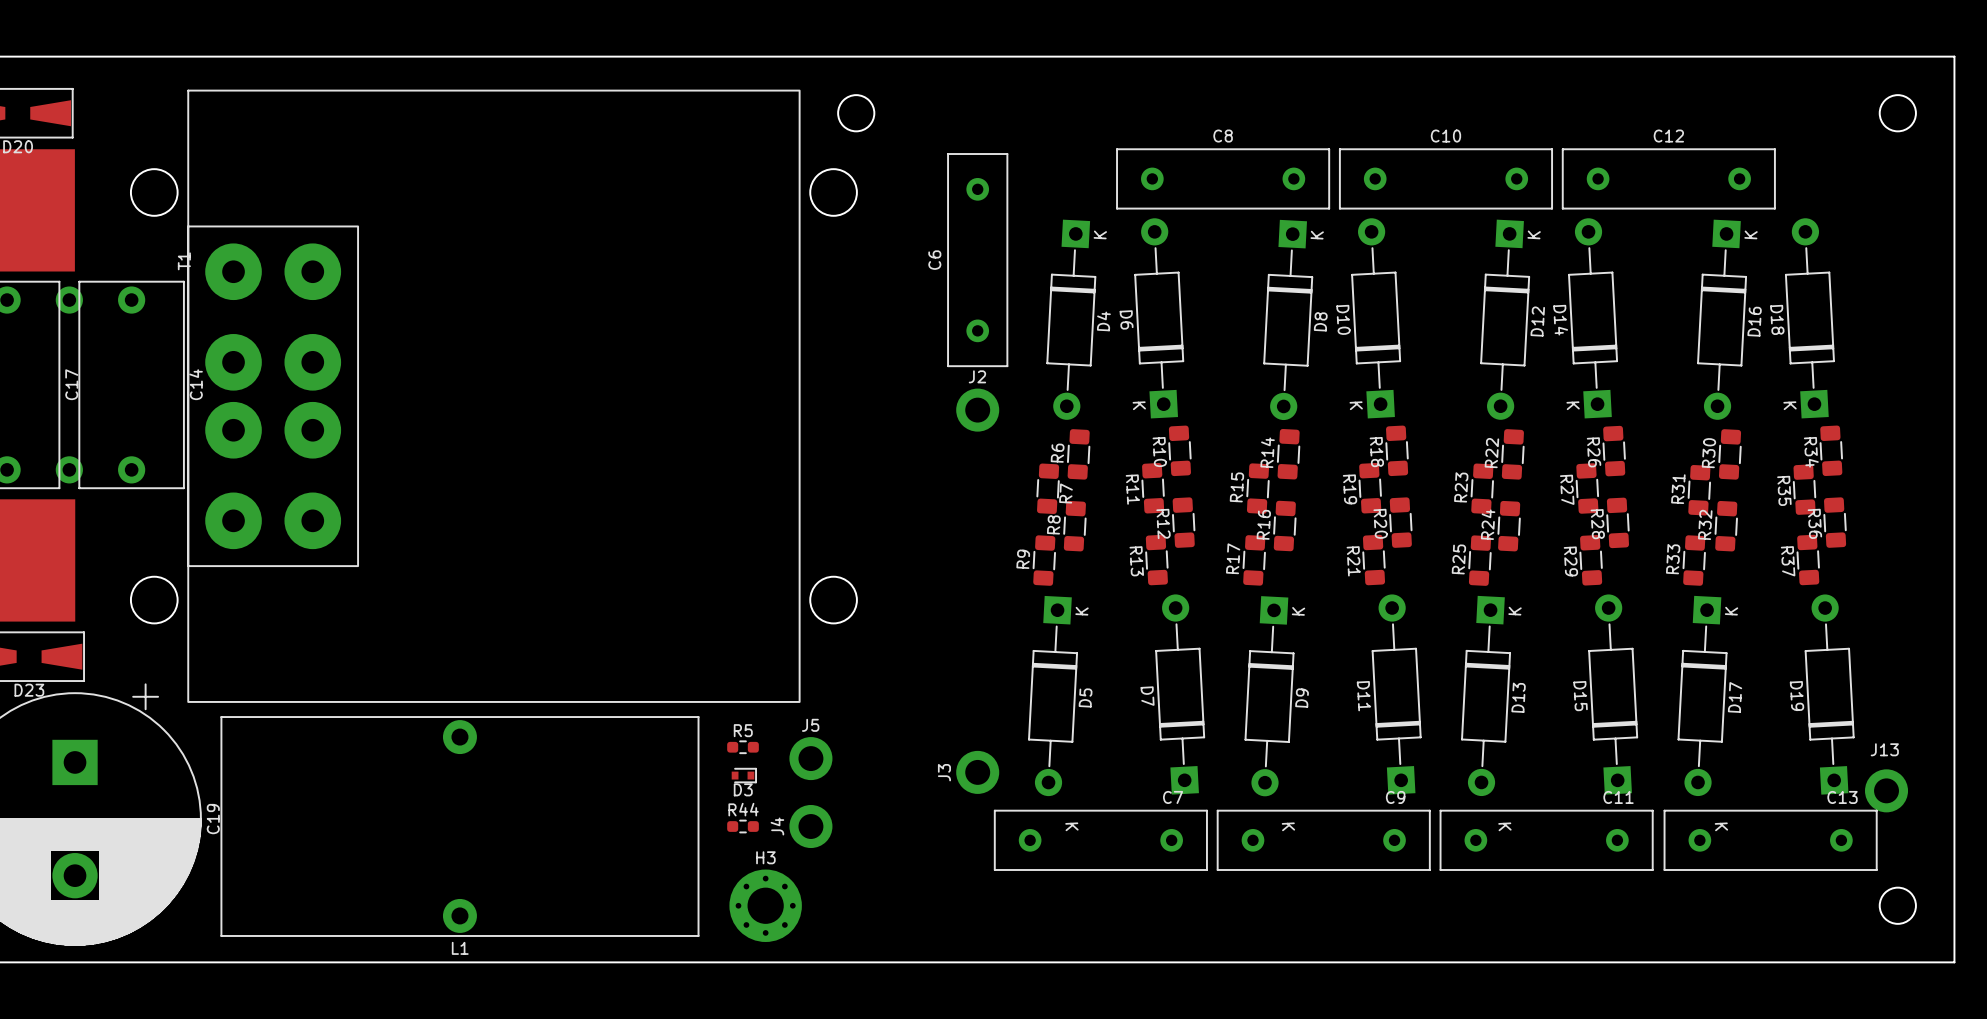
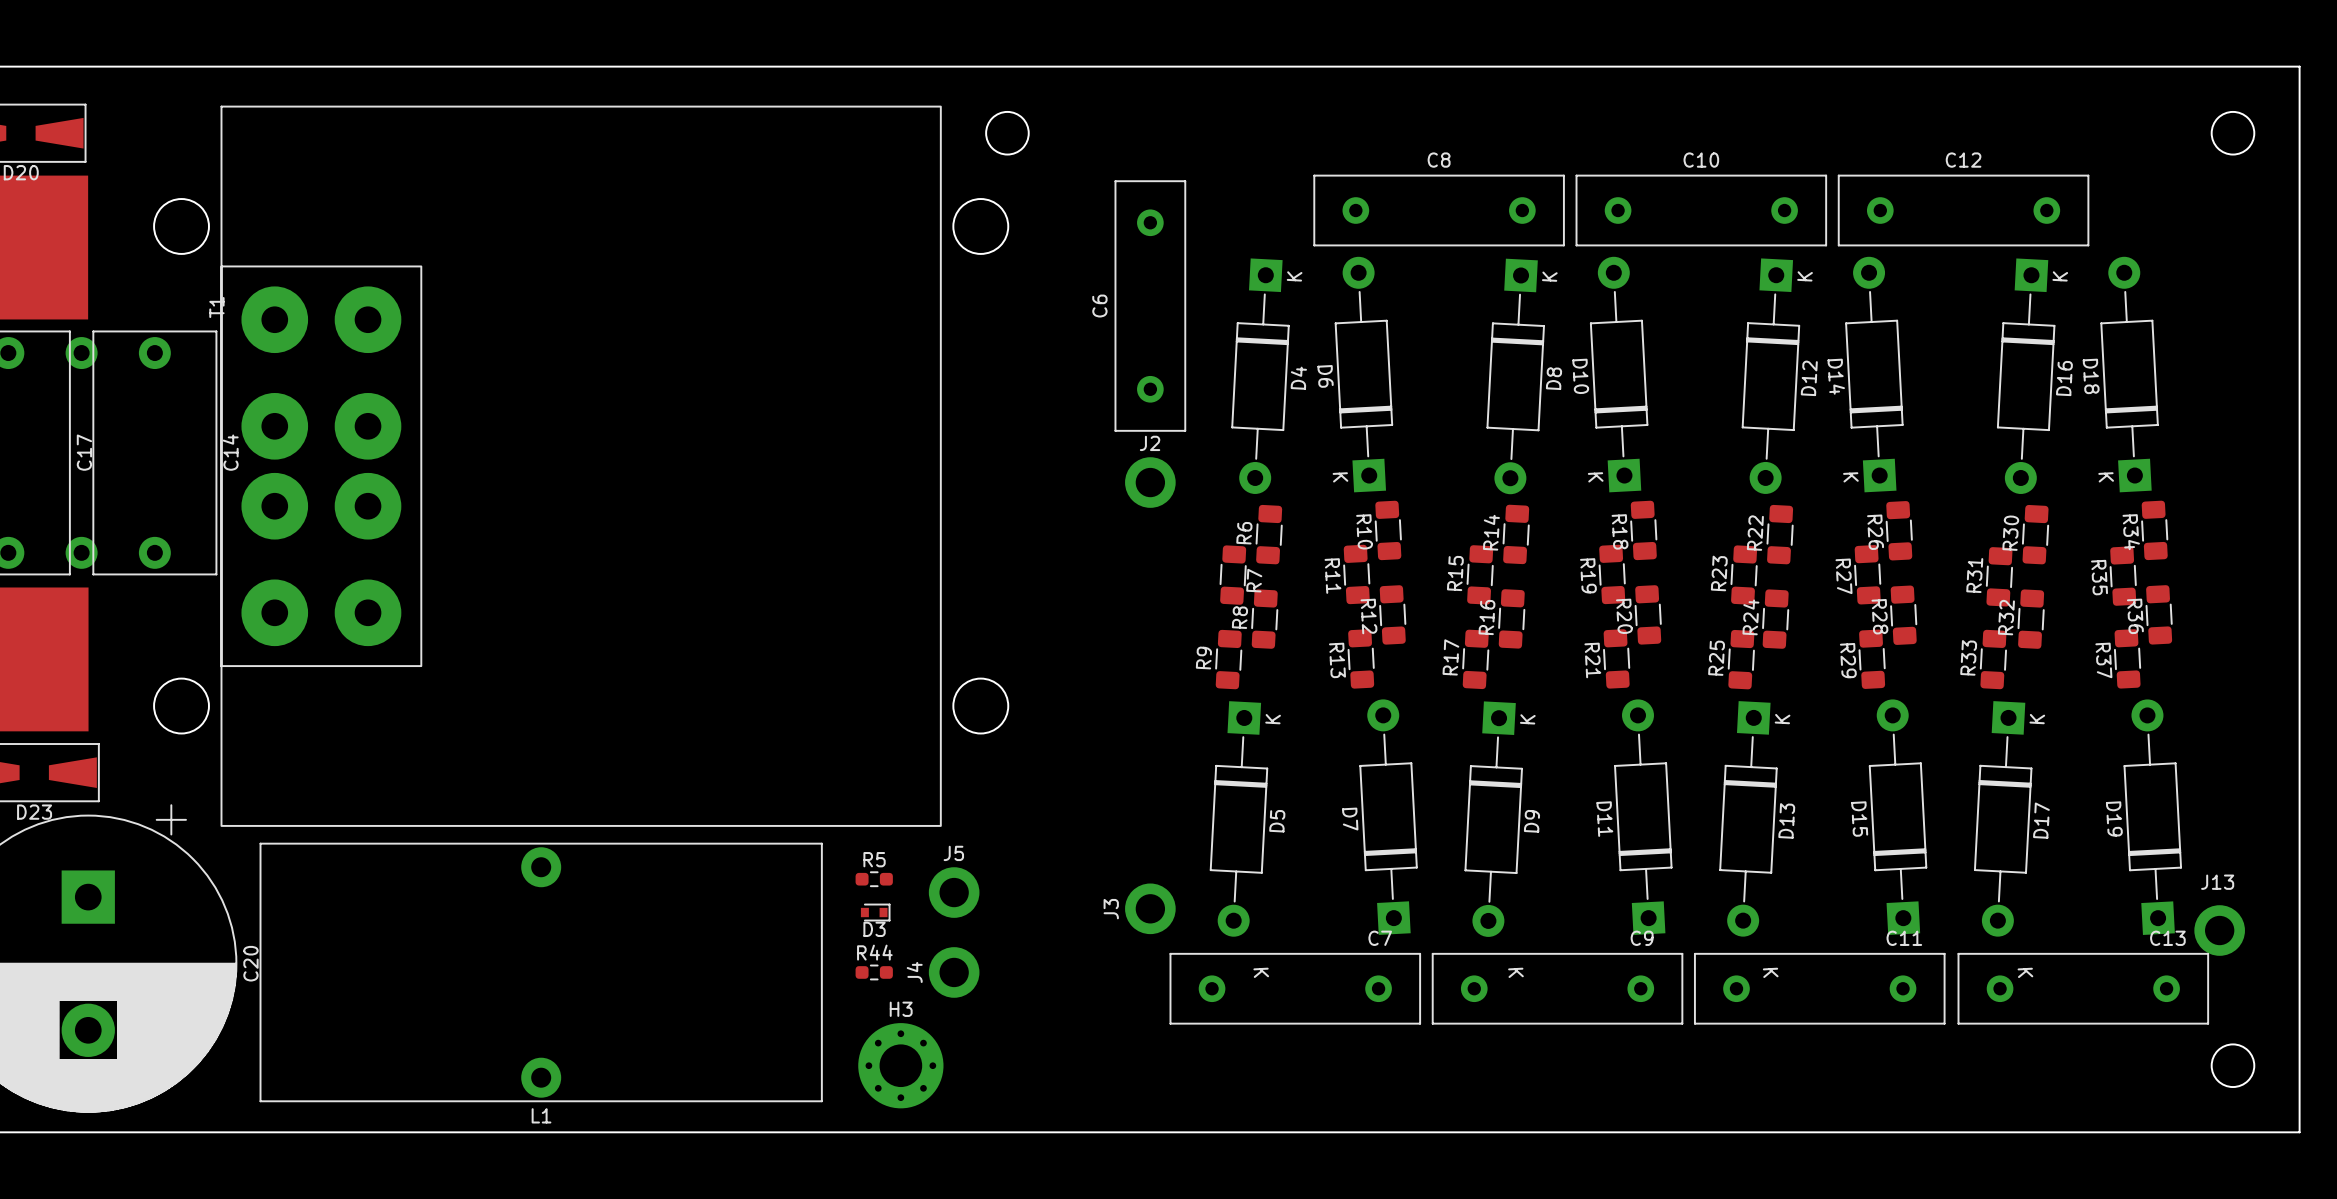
C19 name: C19 (213, 819) -> C20 (250, 963)

